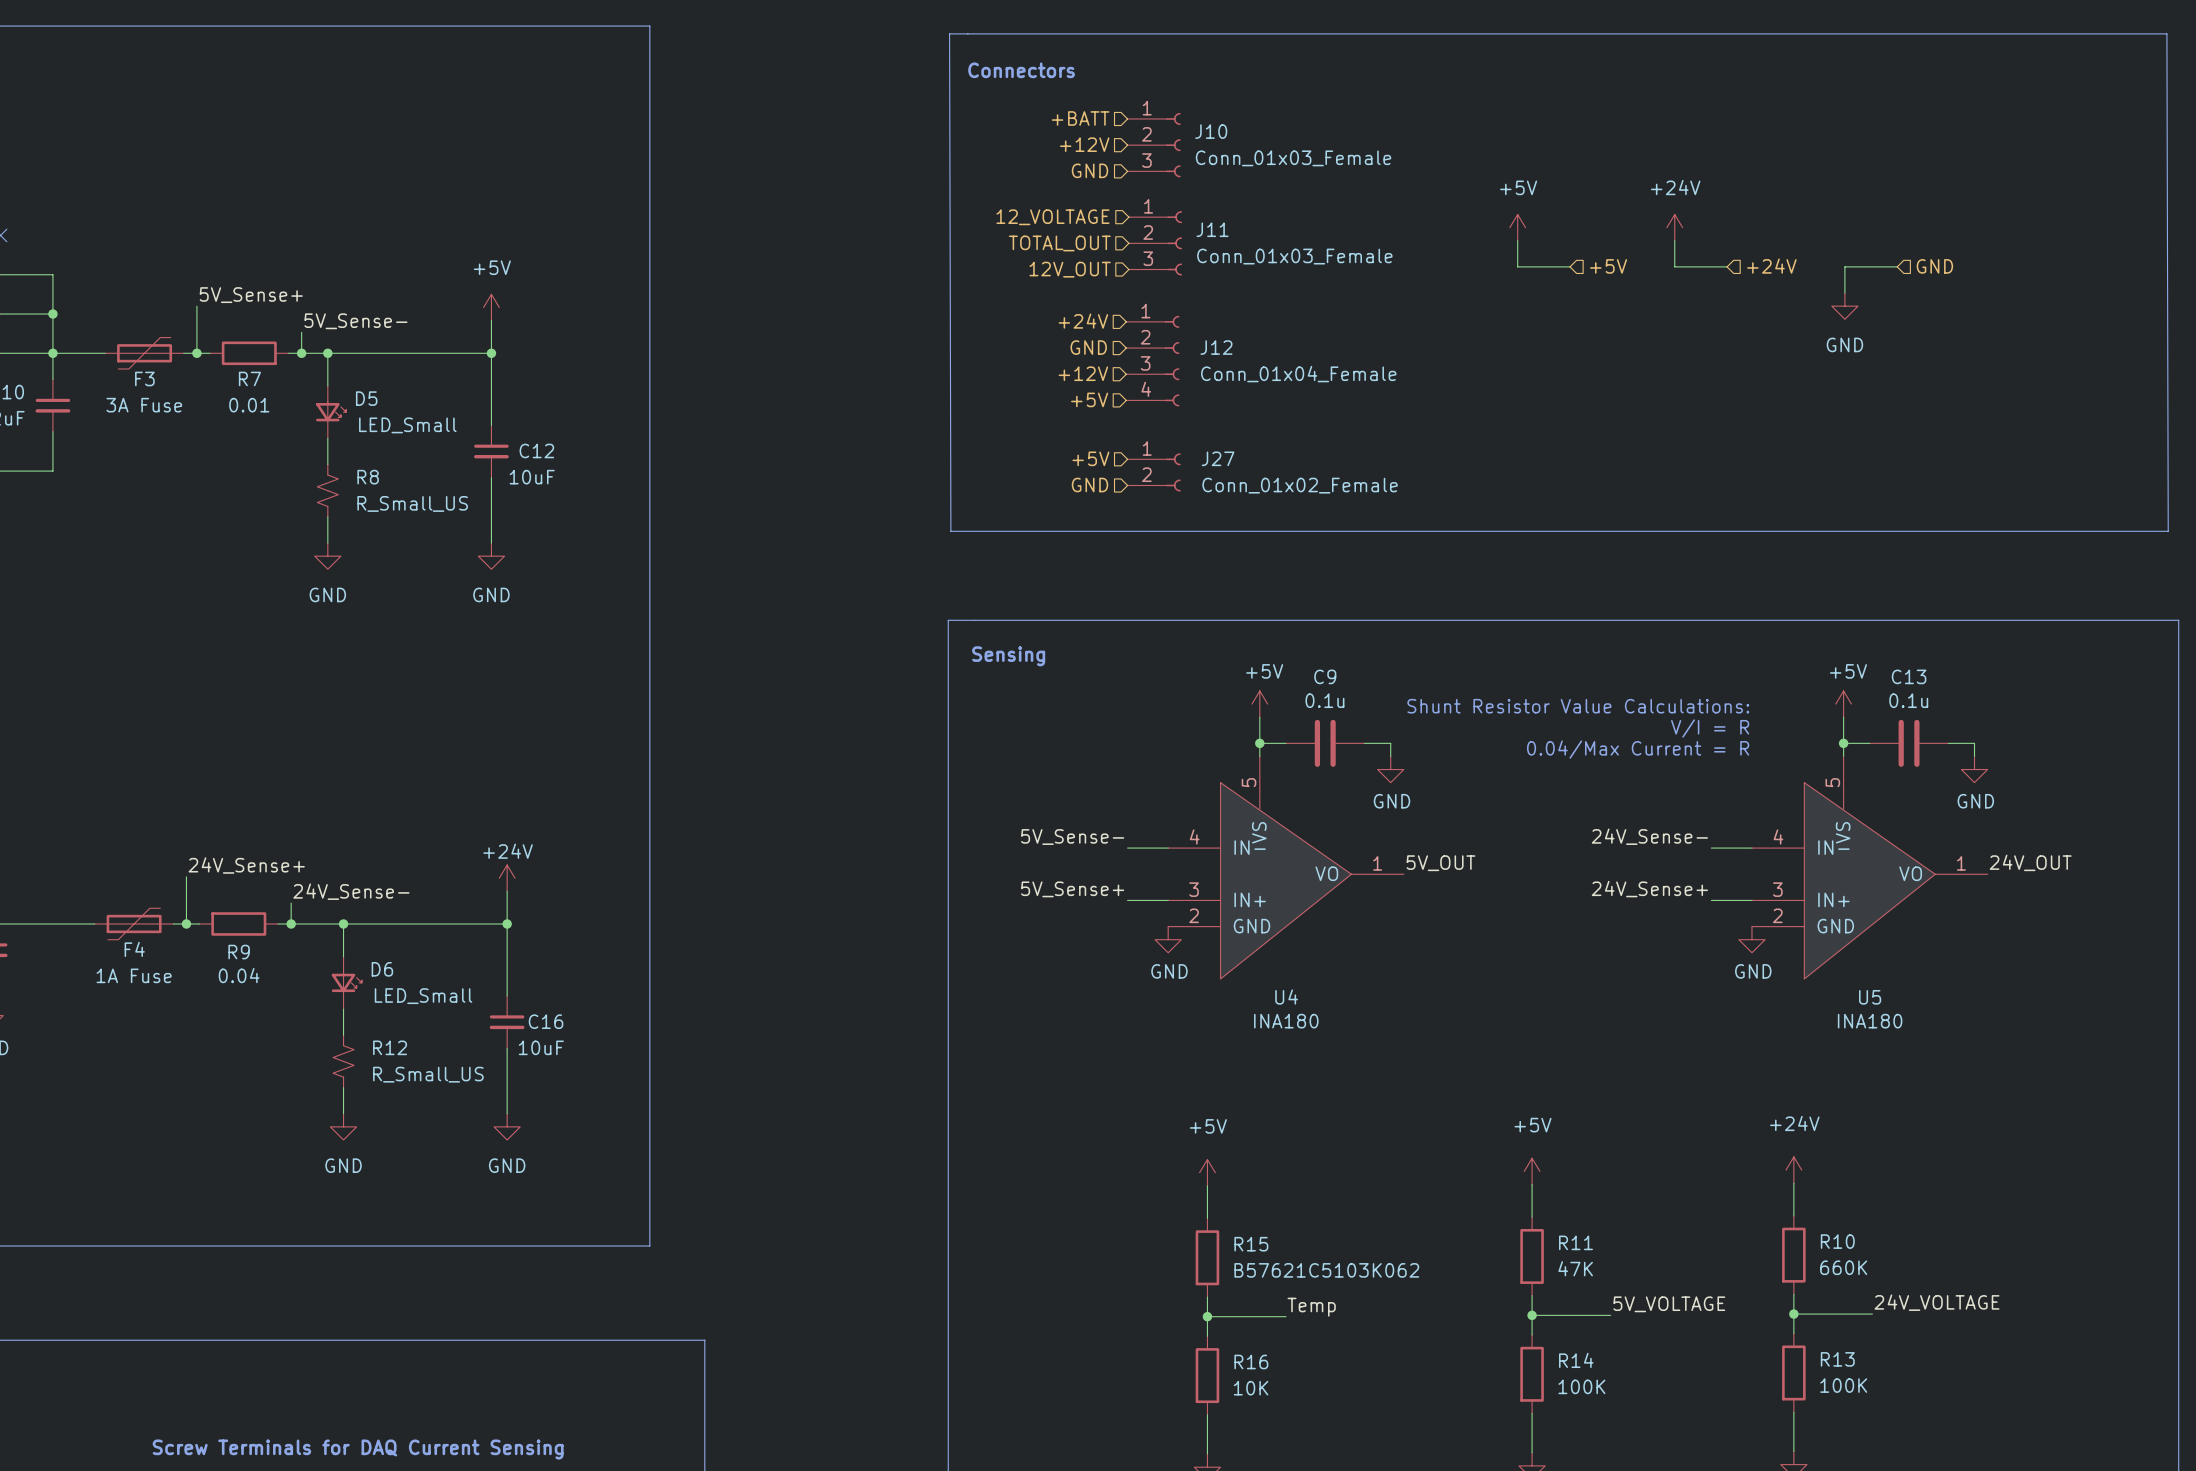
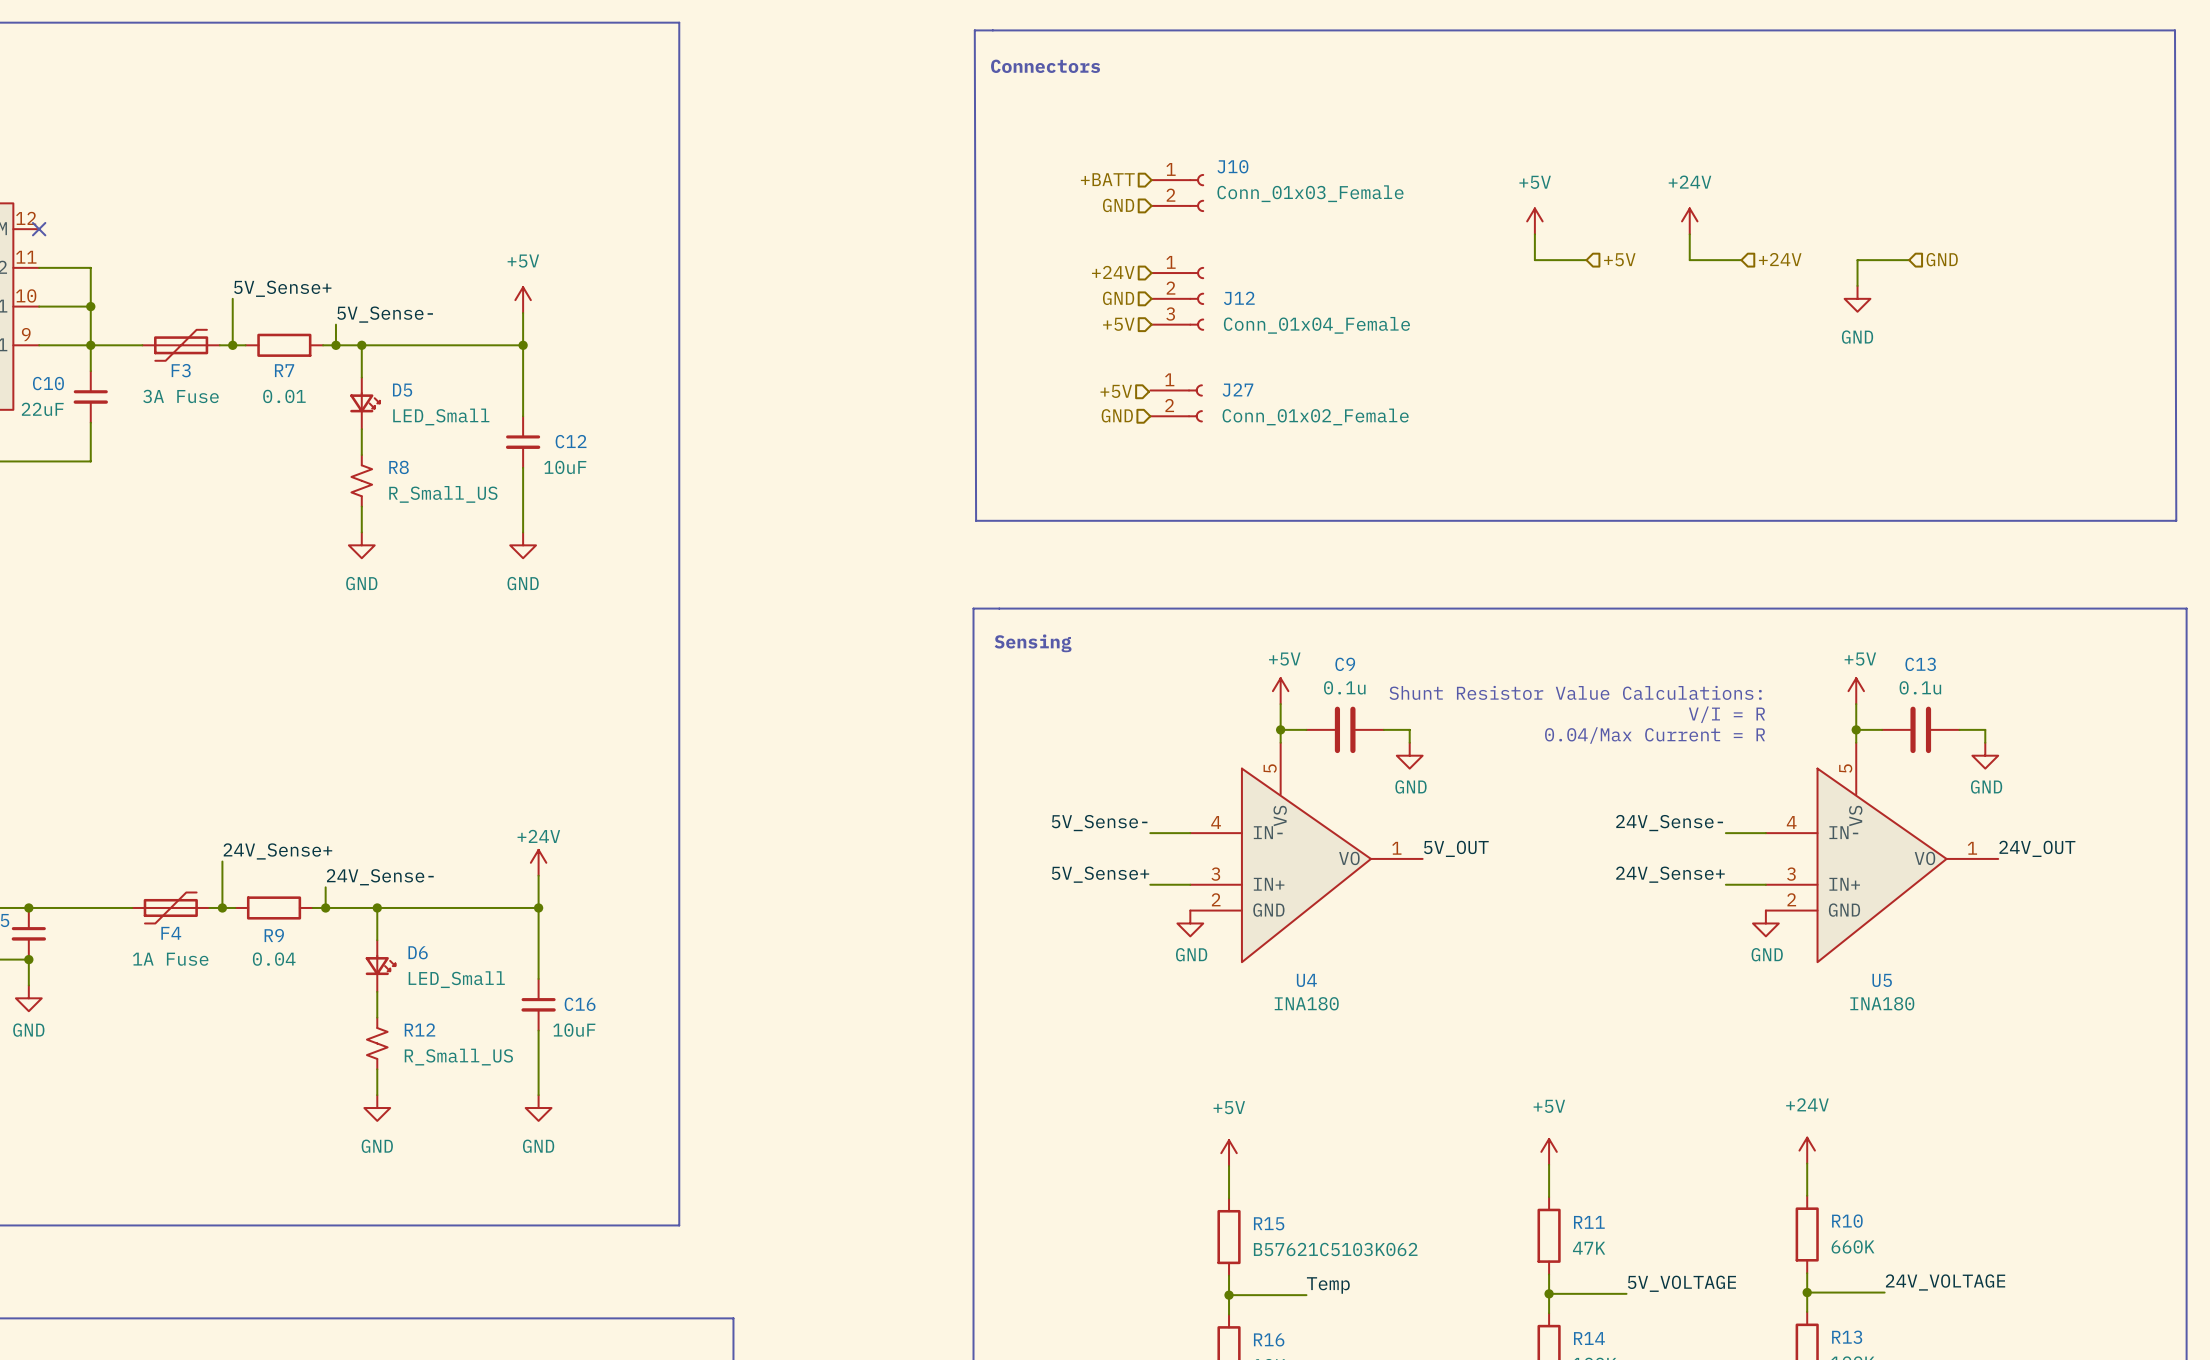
J10 symbol: [1127, 112, 1181, 178] -> [1151, 174, 1205, 212]
hierarchical label position: +BATT (1080, 118) -> +BATT (1107, 179)
hierarchical label: +12V (1084, 144) -> none
hierarchical label position: GND (1090, 170) -> GND (1118, 205)
hierarchical label: 12_VOLTAGE (1052, 217) -> none
hierarchical label: TOTAL_OUT (1059, 243) -> none
J11: Conn_01x03_Female (1155, 243) -> none
hierarchical label: 12V_OUT (1070, 269) -> none
hierarchical label: none -> GND (1118, 298)
J12 symbol: [1126, 315, 1180, 407] -> [1151, 267, 1205, 331]
hierarchical label position: +24V (1083, 321) -> +24V (1113, 272)
hierarchical label: GND (1088, 347) -> none
hierarchical label: +12V (1083, 373) -> none
hierarchical label: none -> GND (1117, 415)
hierarchical label position: +5V (1090, 458) -> +5V (1118, 324)
J27 position: (1154, 472) -> (1176, 403)
hierarchical label: GND (1090, 485) -> none

